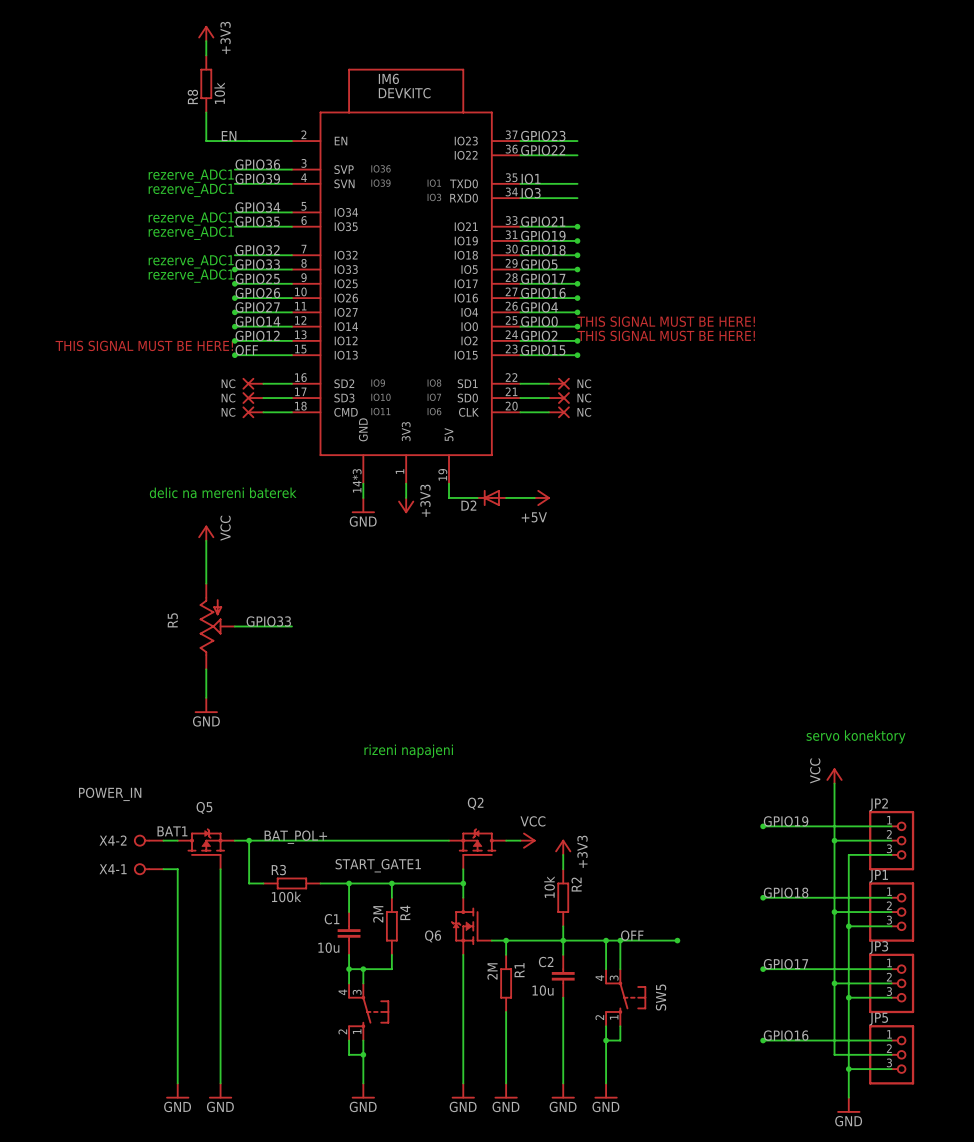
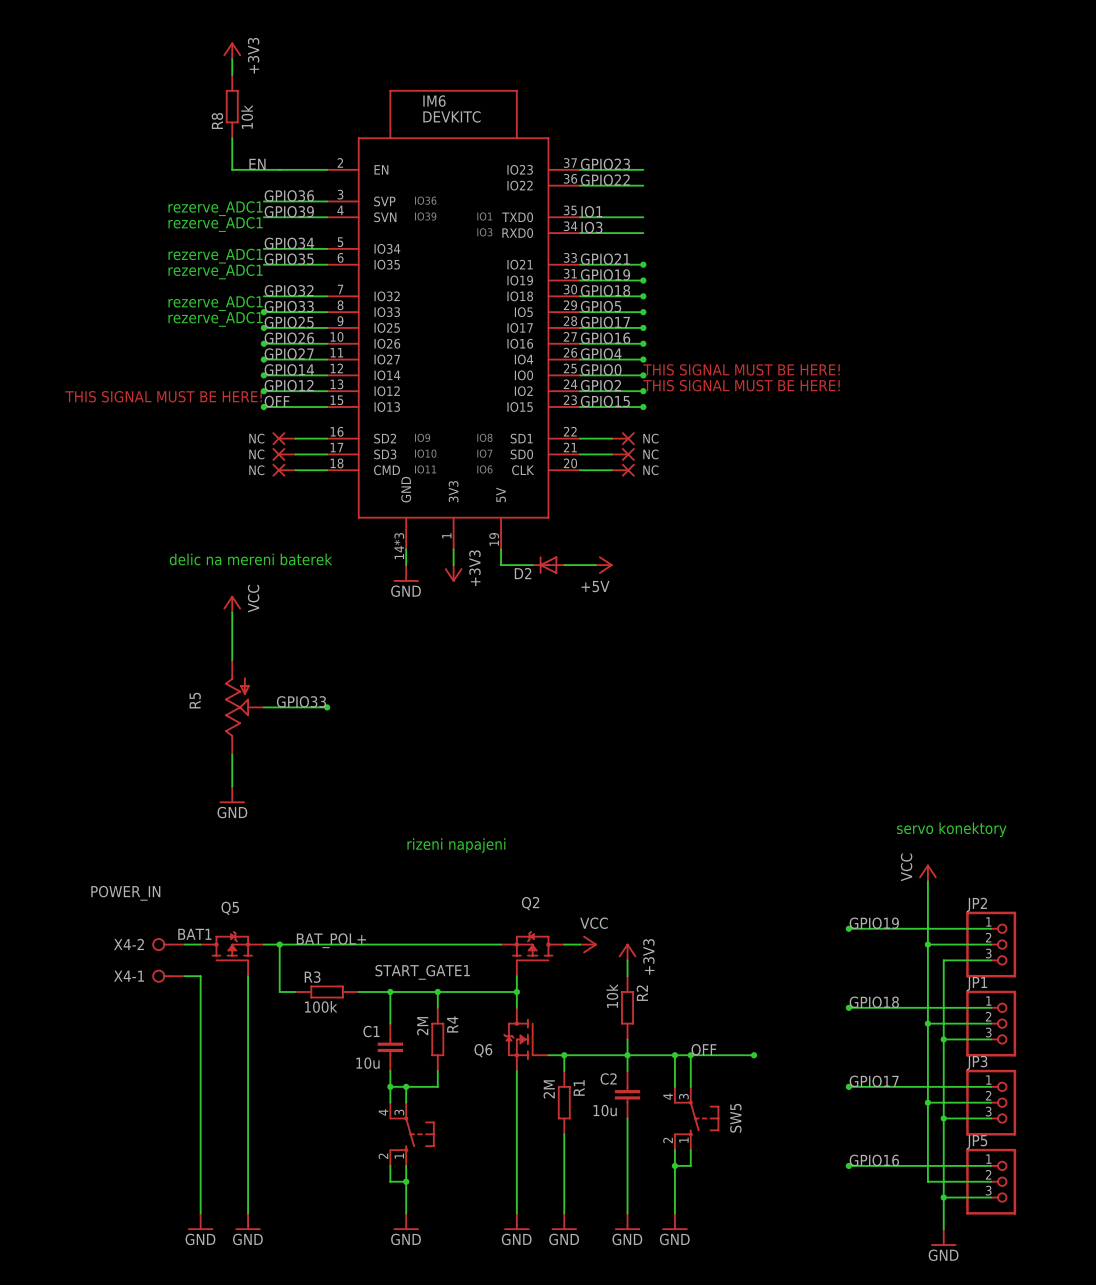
junction: none -> (327, 707)

